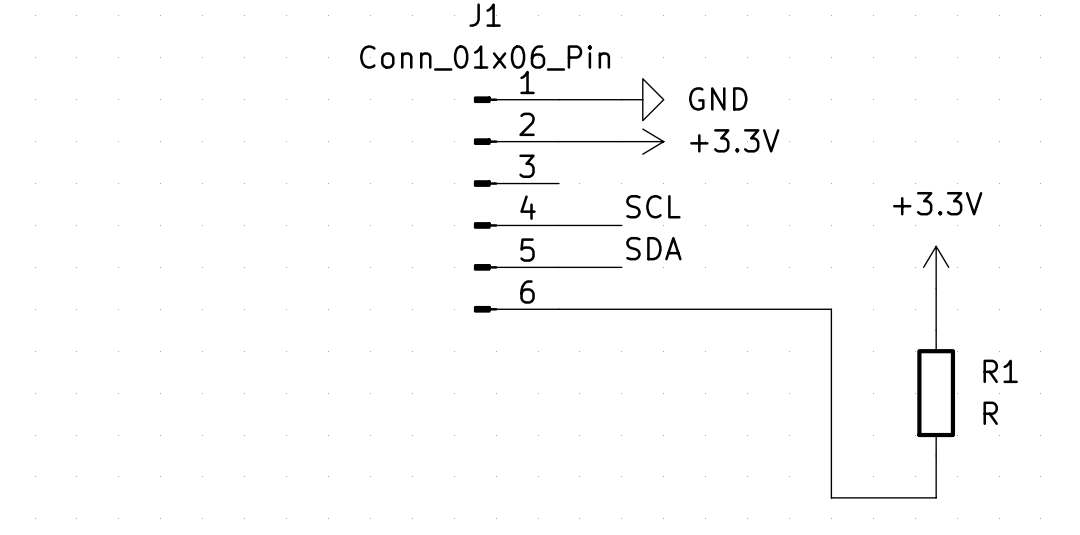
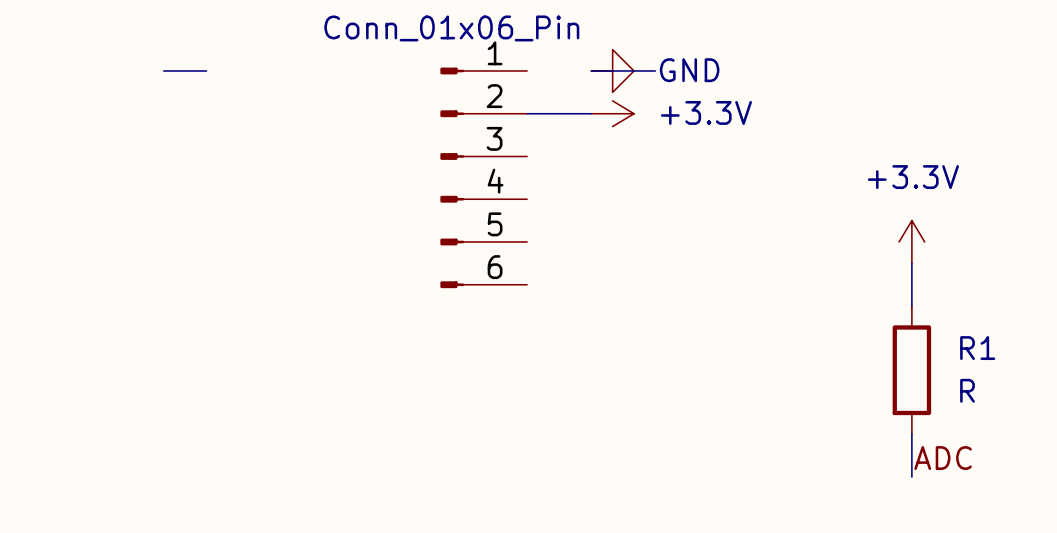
wire: none -> (163, 70) (206, 70)
wire: (558, 99) (621, 99) -> (655, 70) (591, 70)
label: SCL (653, 206) -> none
wire: (558, 225) (621, 225) -> none
label: SDA (653, 248) -> none
wire: (558, 267) (621, 267) -> none
wire: (558, 309) (831, 309) (831, 497) (936, 497) -> none
label: none -> ADC (943, 458)

